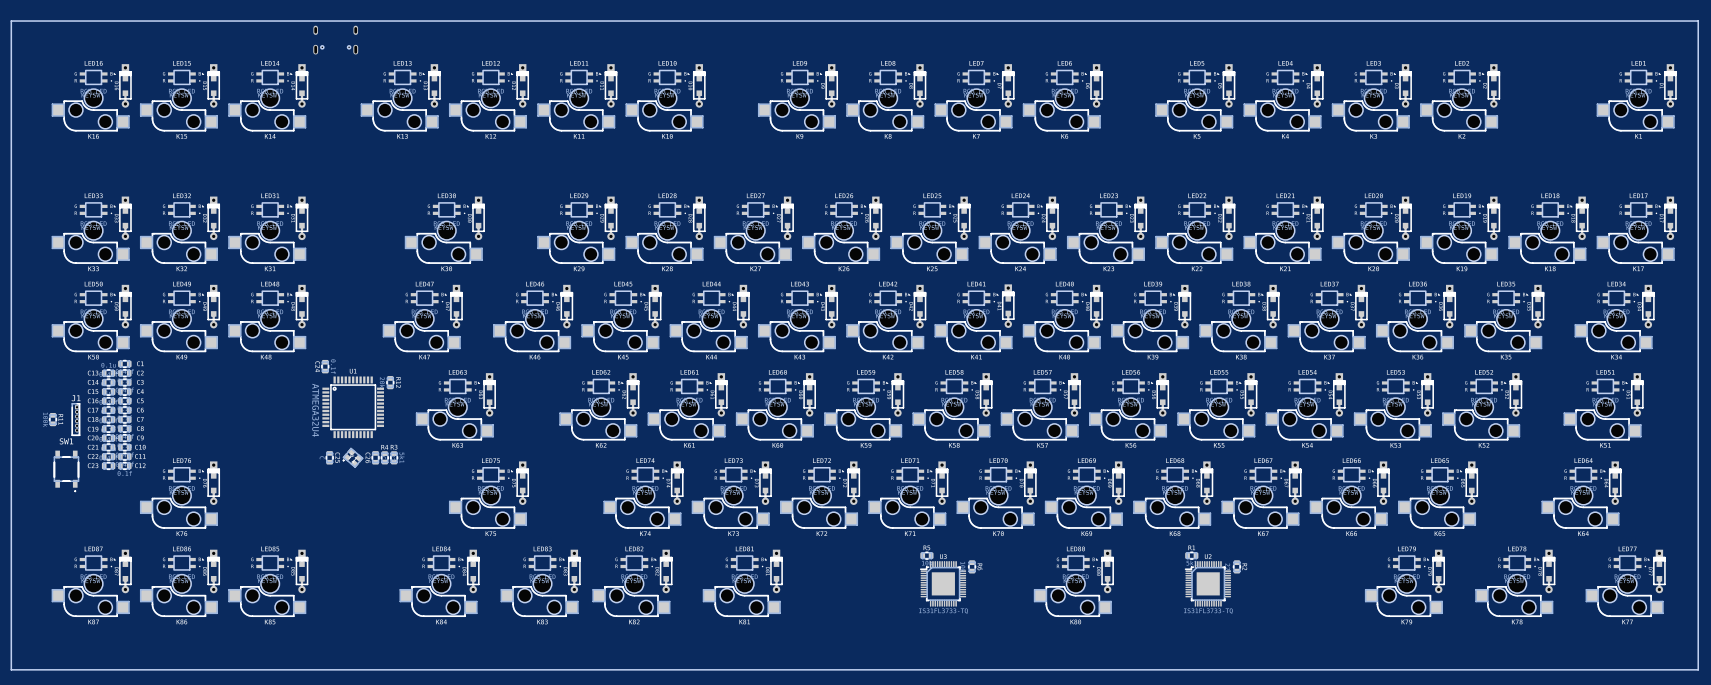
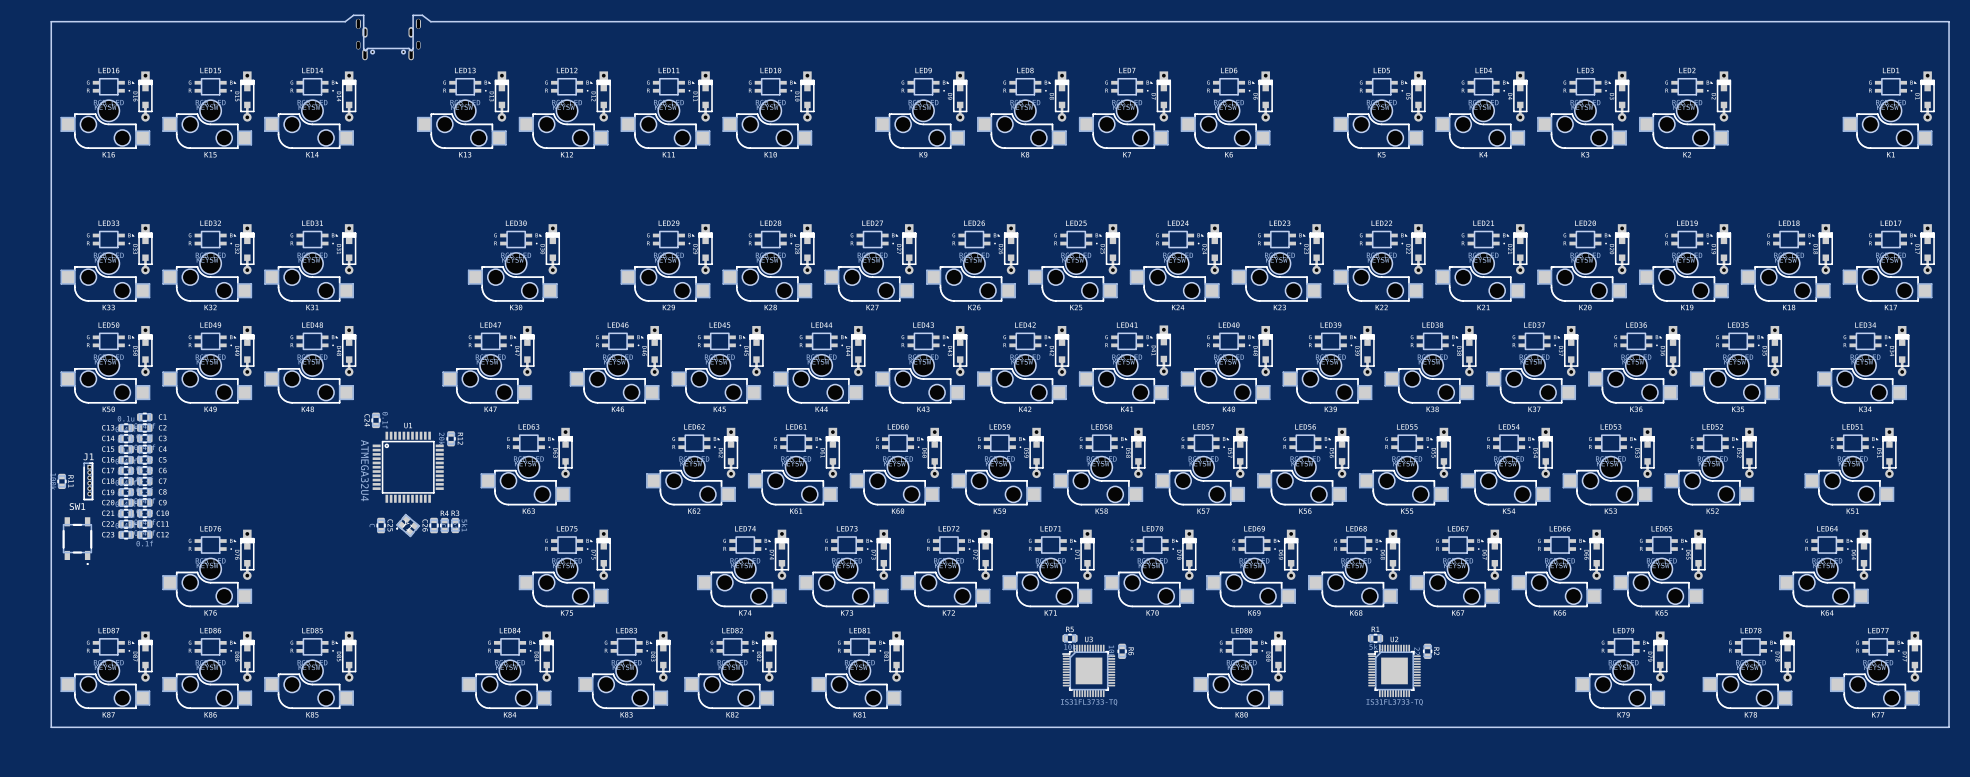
board edge: none -> (353, 15) (345, 21)
board edge: (372, 21) (298, 21) -> (430, 21) (422, 15)
board edge: (1688, 21) (1698, 21) (1698, 669) (11, 669) (11, 21) (43, 21) -> (1949, 21) (1949, 727) (51, 727) (51, 21)
part: none -> (387, 32)

